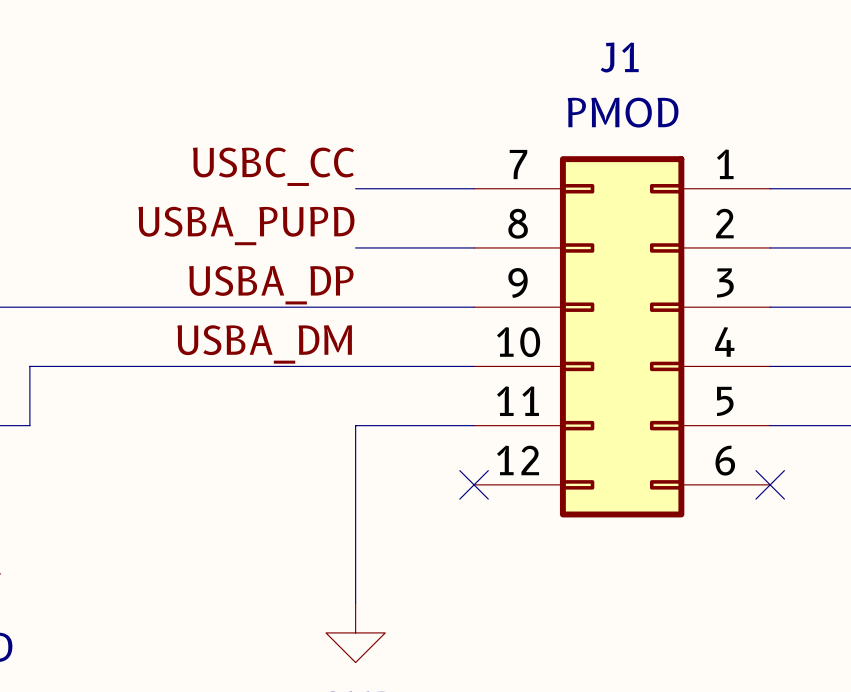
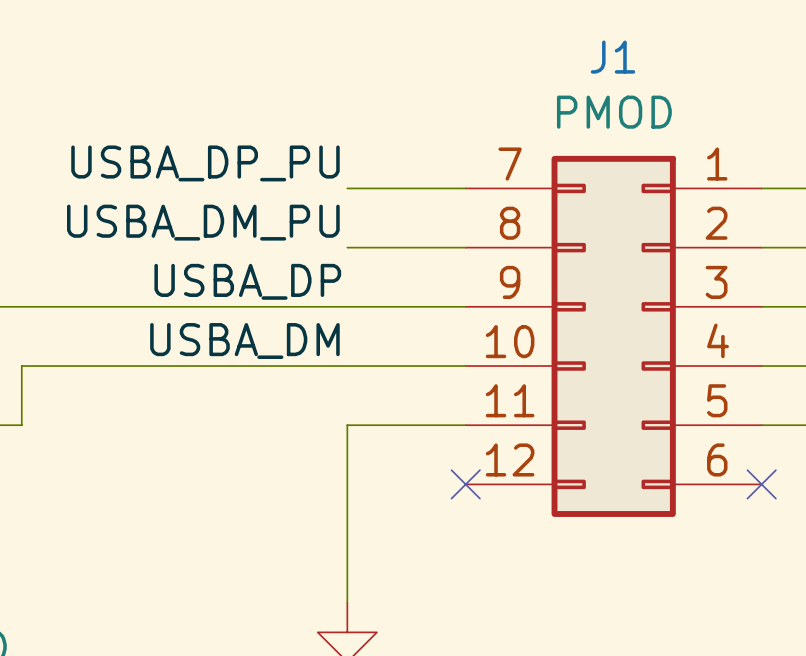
label: USBC_CC (273, 166) -> USBA_DP_PU (205, 163)
label: USBA_PUPD (246, 225) -> USBA_DM_PU (203, 222)

